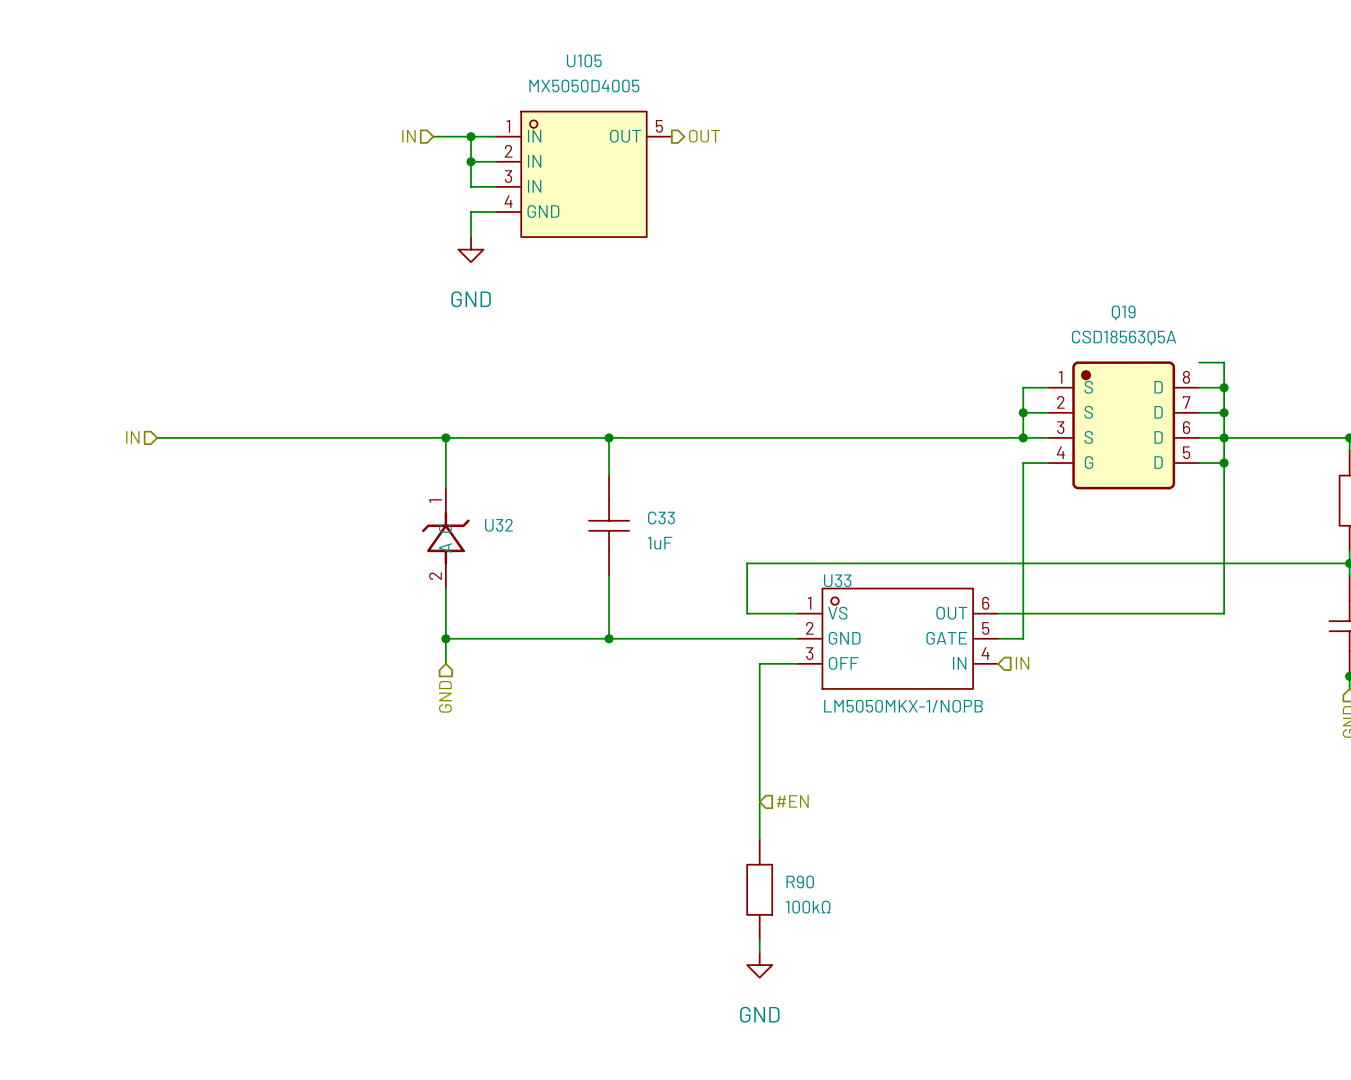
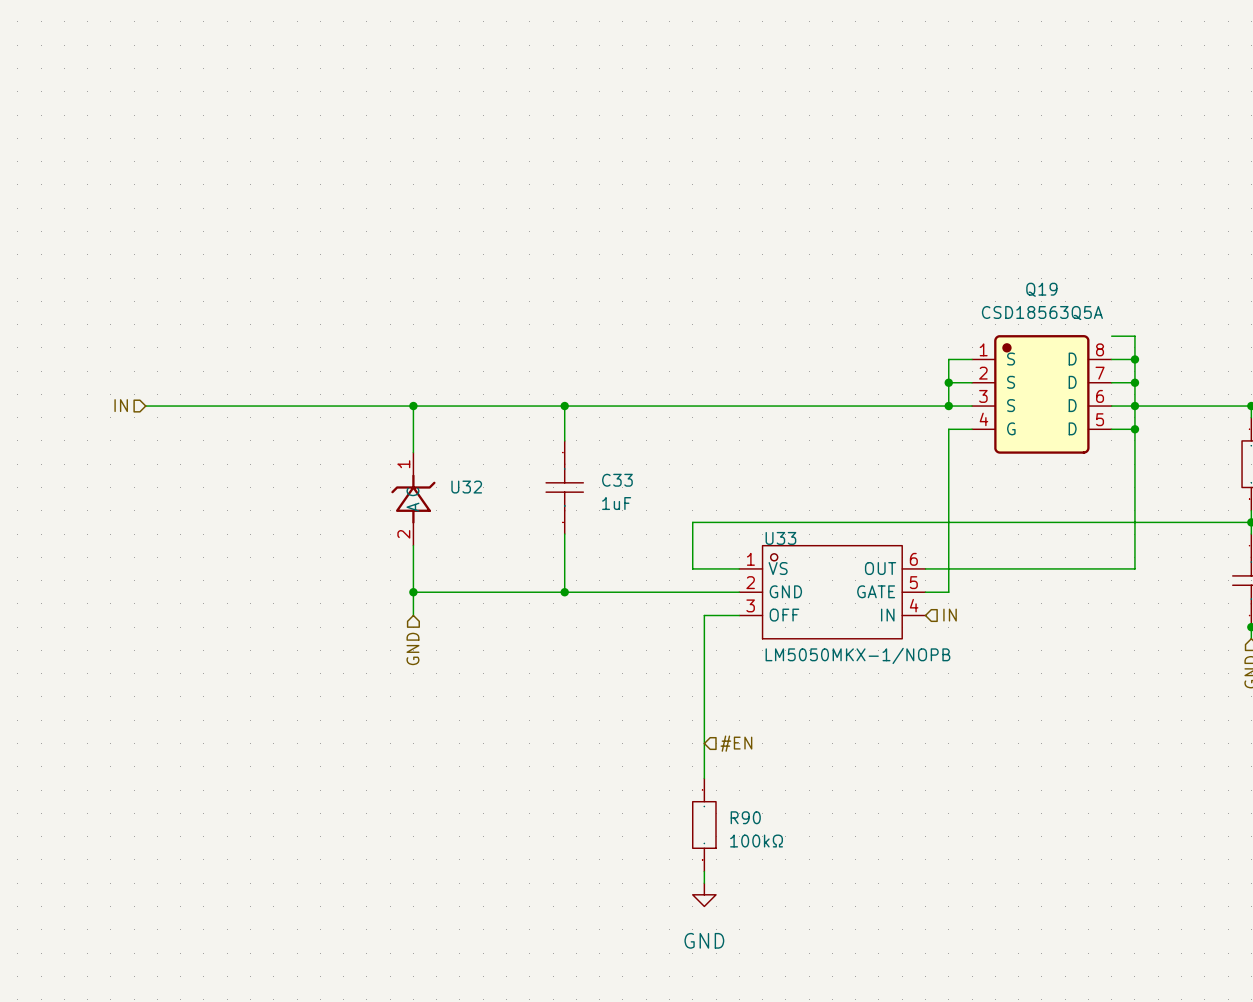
hierarchical label: IN (409, 136) -> none
wire: (433, 136) (496, 136) -> none
wire: (470, 136) (470, 186) (496, 186) -> none
junction: (470, 136) -> none
hierarchical label: OUT (704, 136) -> none
wire: (470, 161) (496, 161) -> none
junction: (470, 161) -> none
U105: MX5050D4005 (583, 174) -> none
wire: (496, 211) (470, 211) (470, 237) -> none
power symbol: GND (470, 249) -> none

